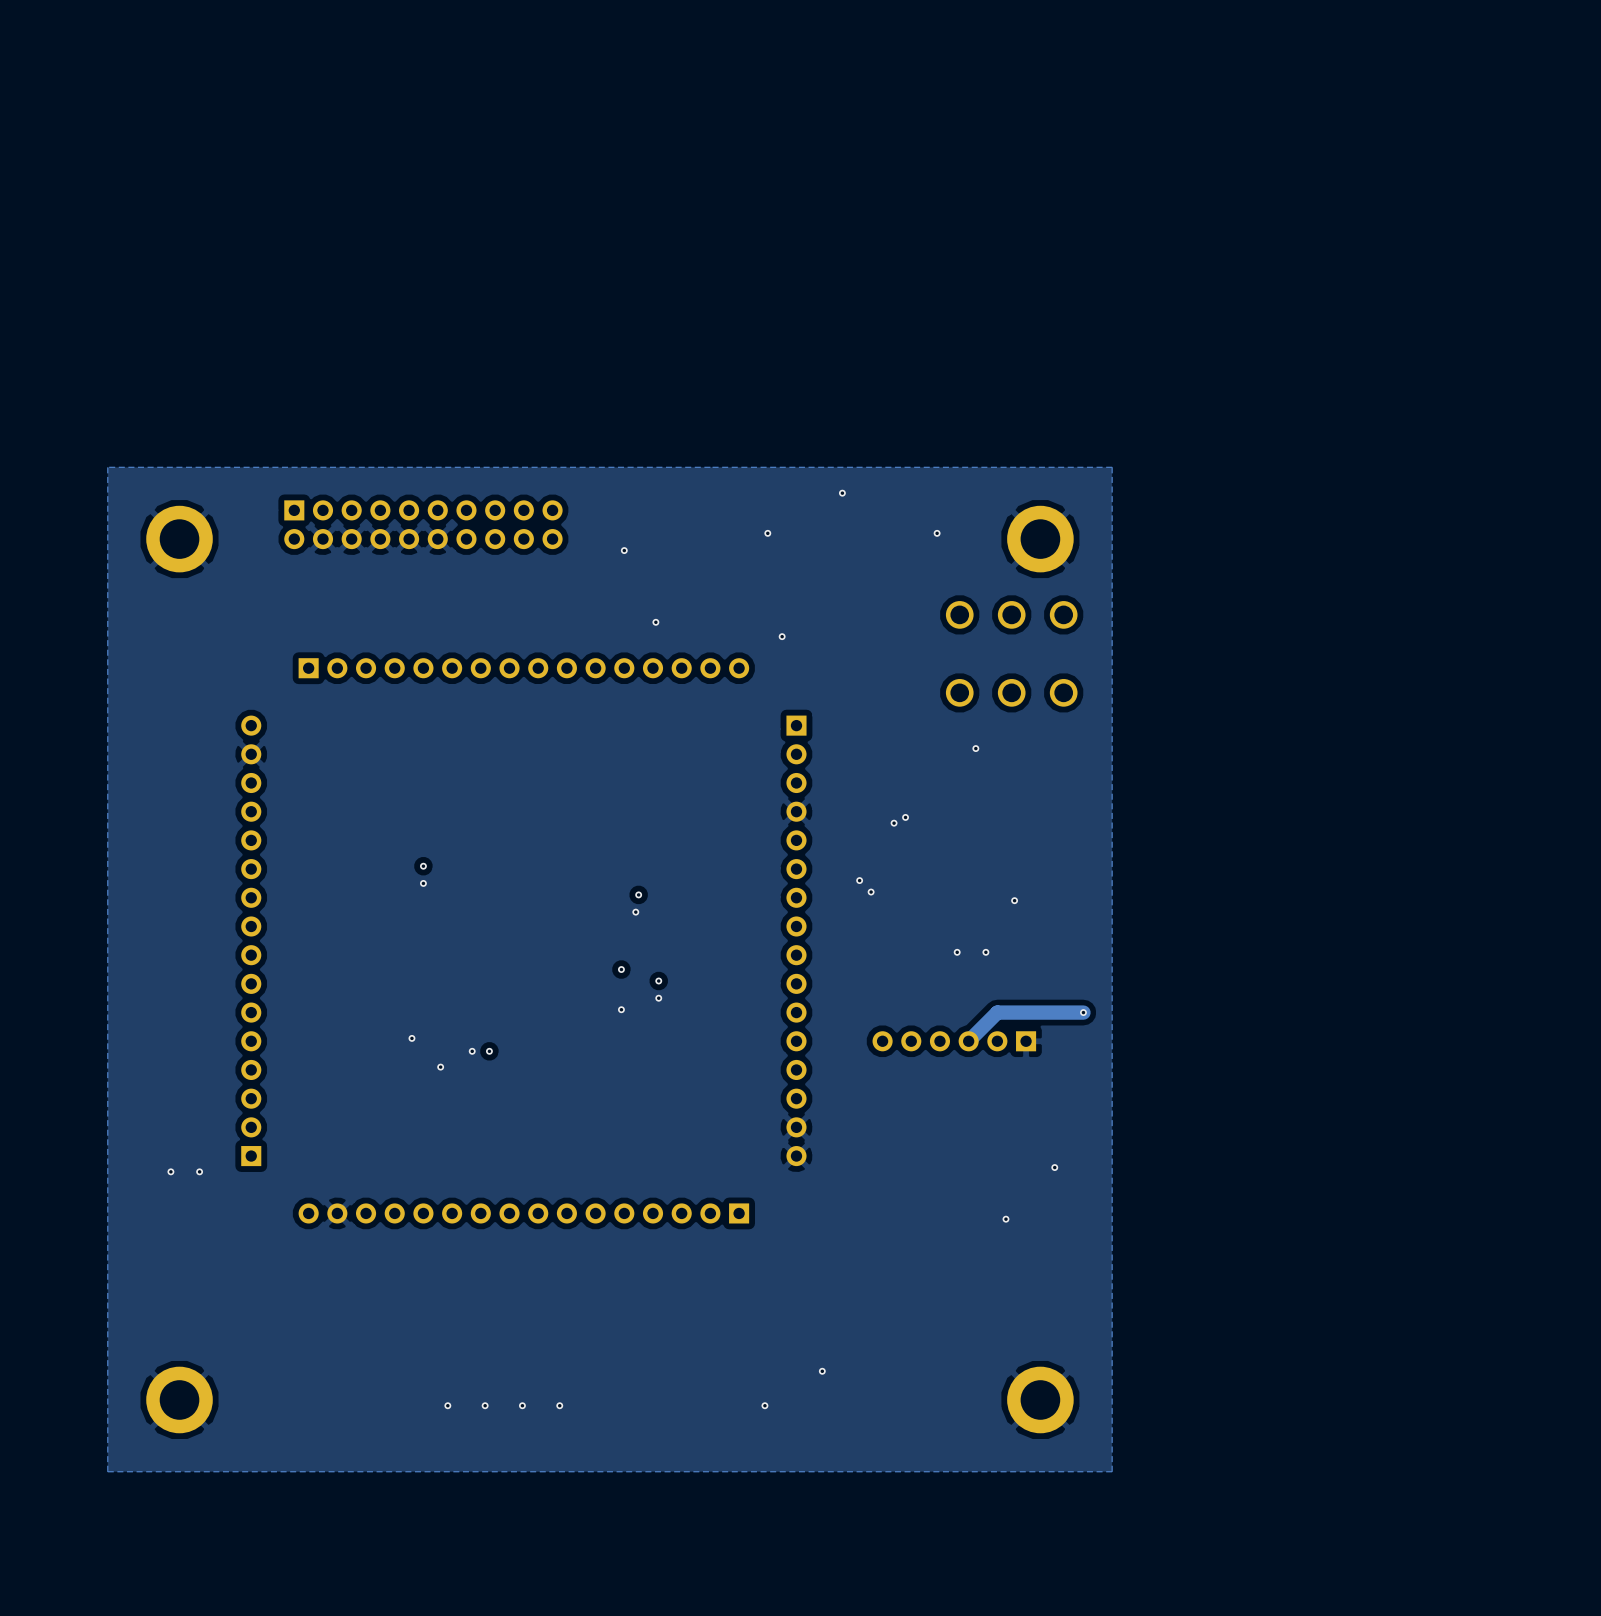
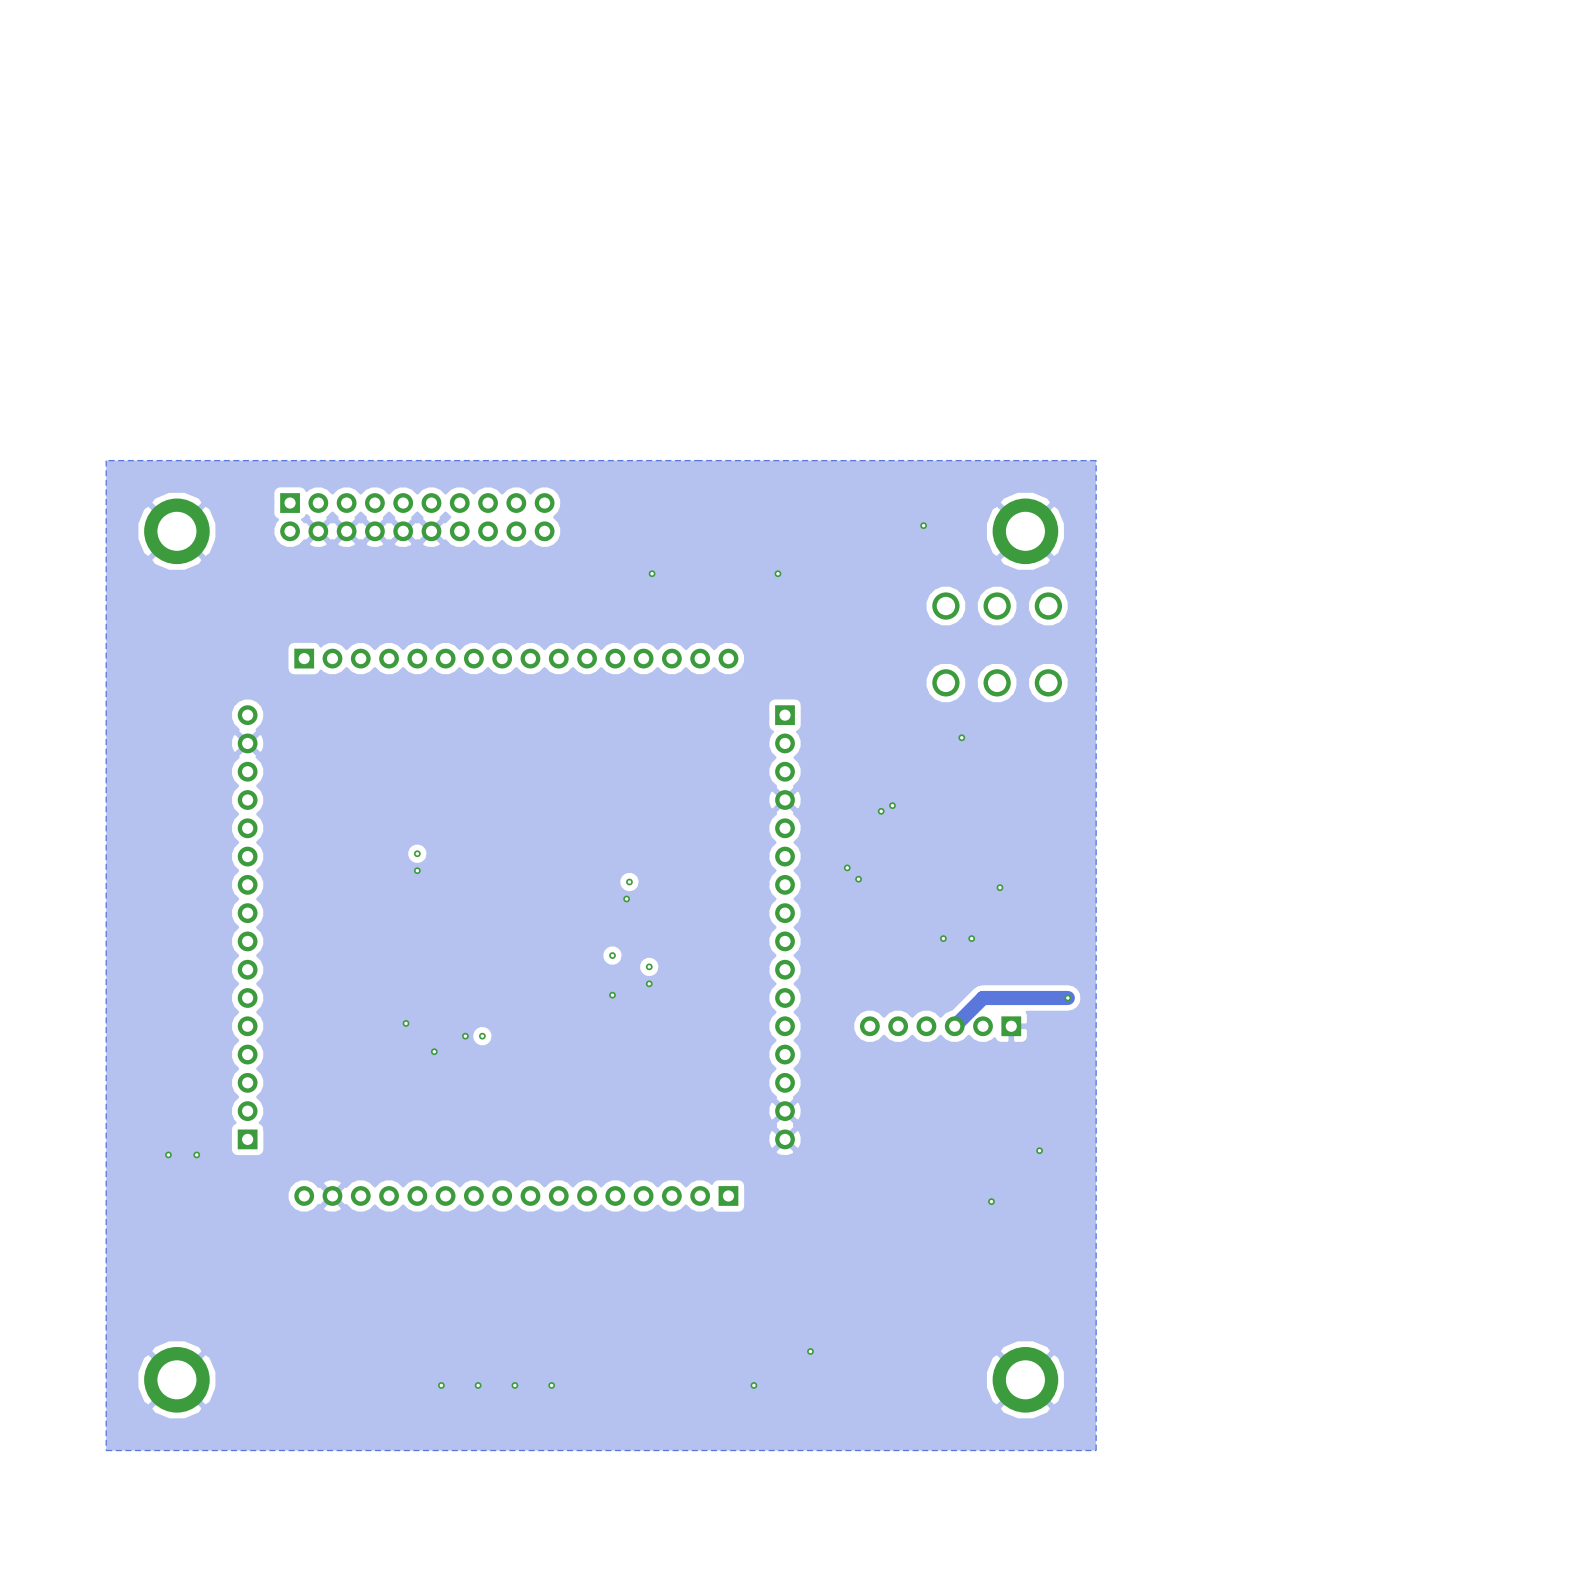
via: (842, 493) -> none
via: (767, 533) -> none
via: (624, 550) -> none
via: none -> (652, 573)
via: none -> (777, 573)
via: (655, 622) -> none
via: (782, 636) -> none

